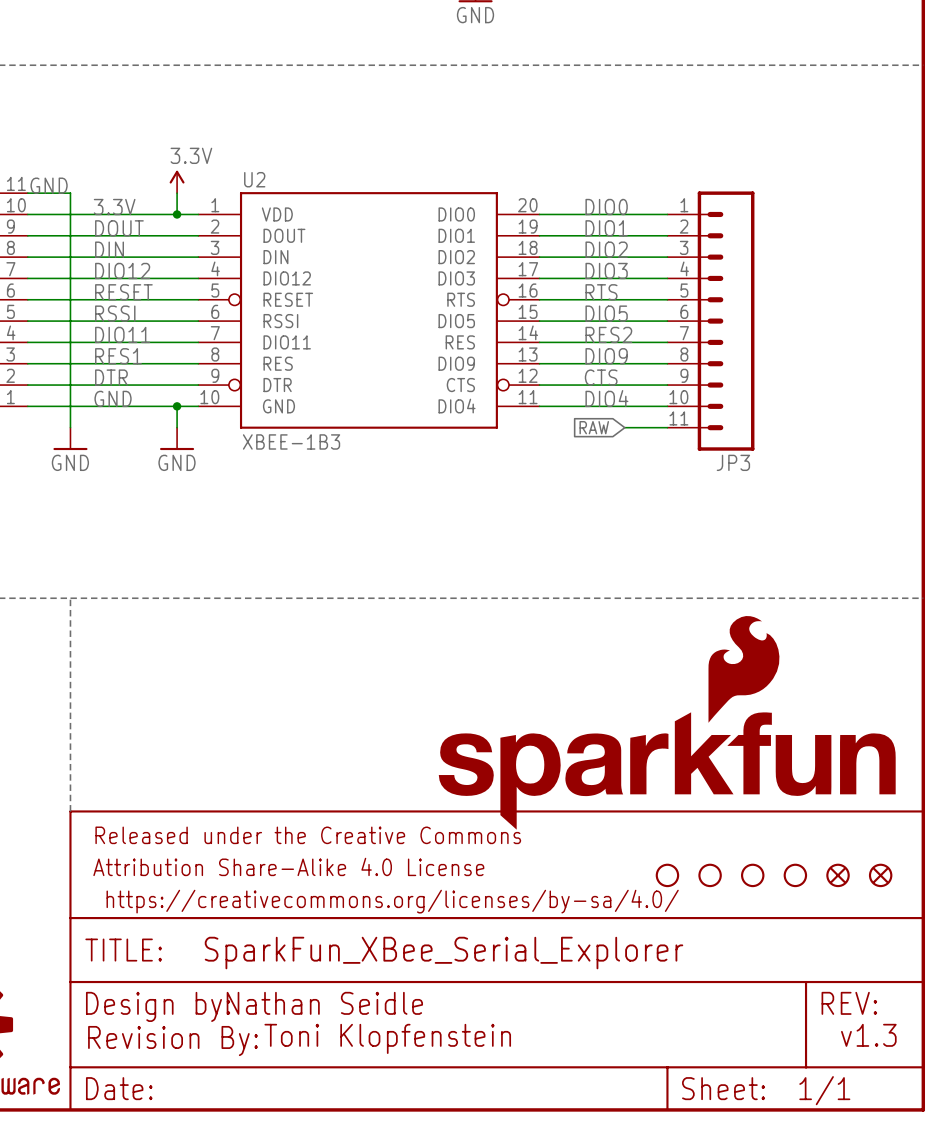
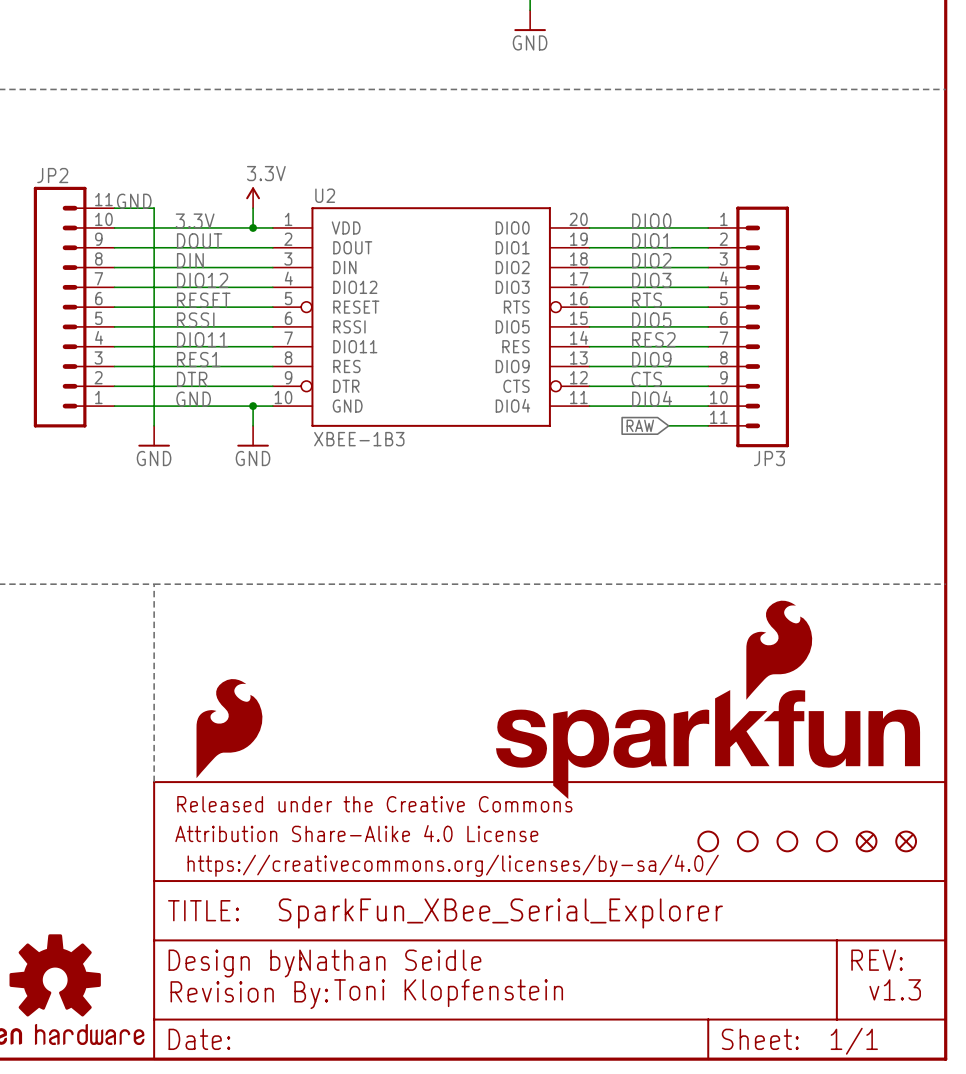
part: none -> (229, 728)

